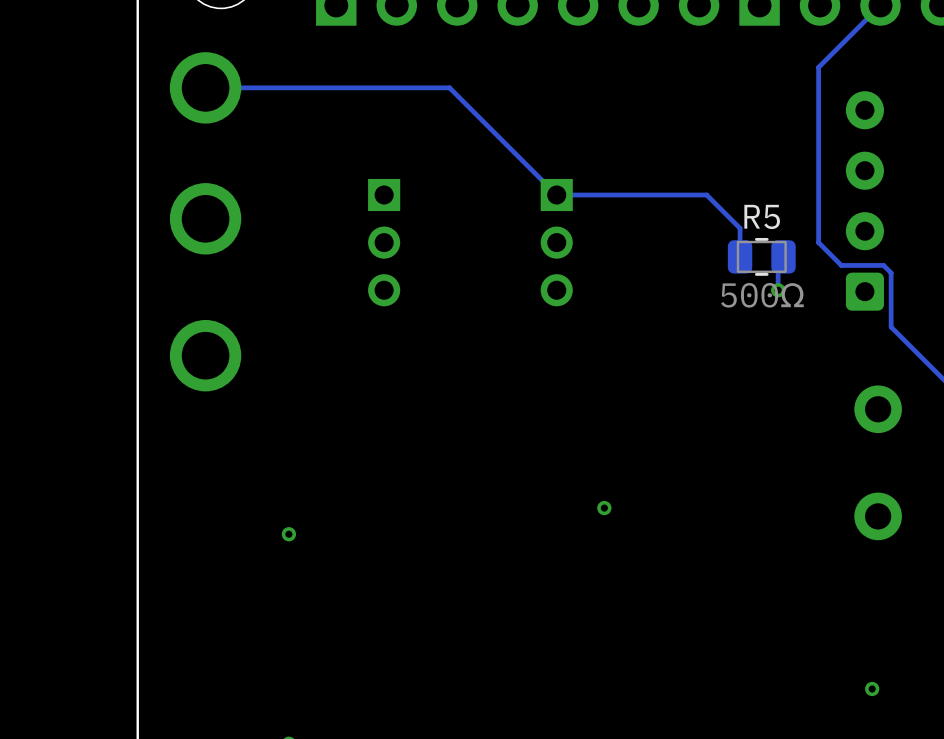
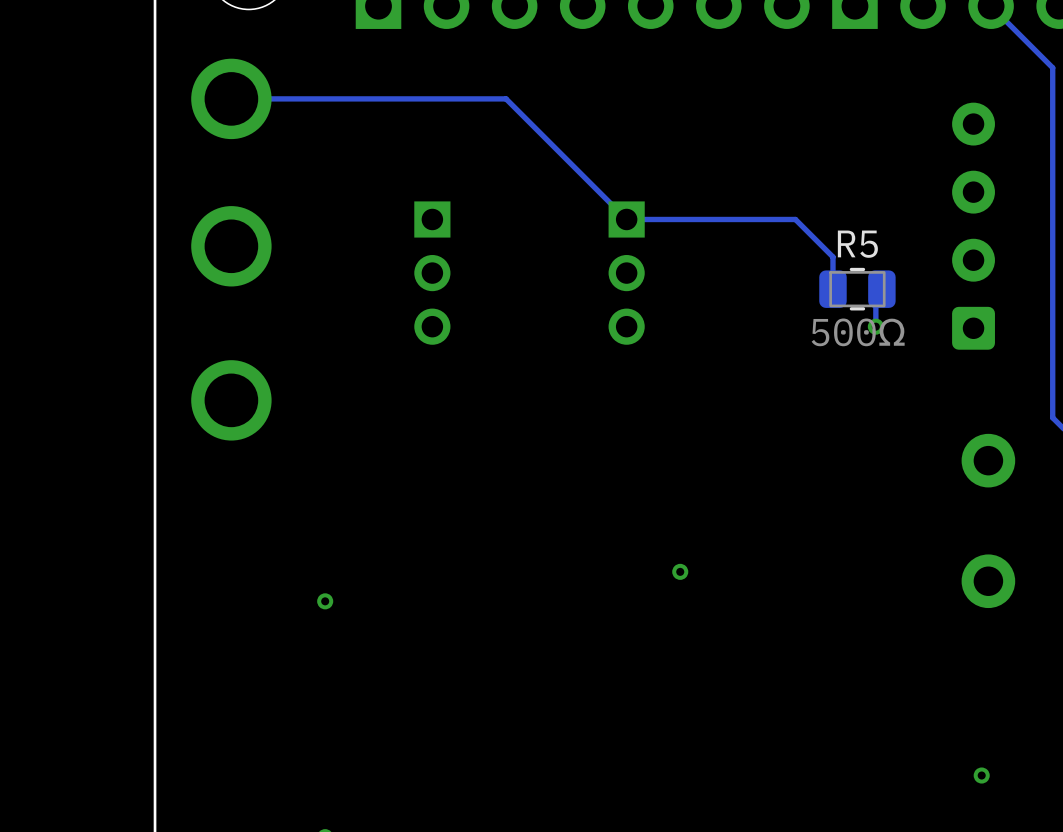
track: (880, 5) (818, 67) (818, 242) (841, 265) (883, 265) (891, 272) (891, 327) (935, 371) -> (991, 6) (1052, 67) (1052, 417)

